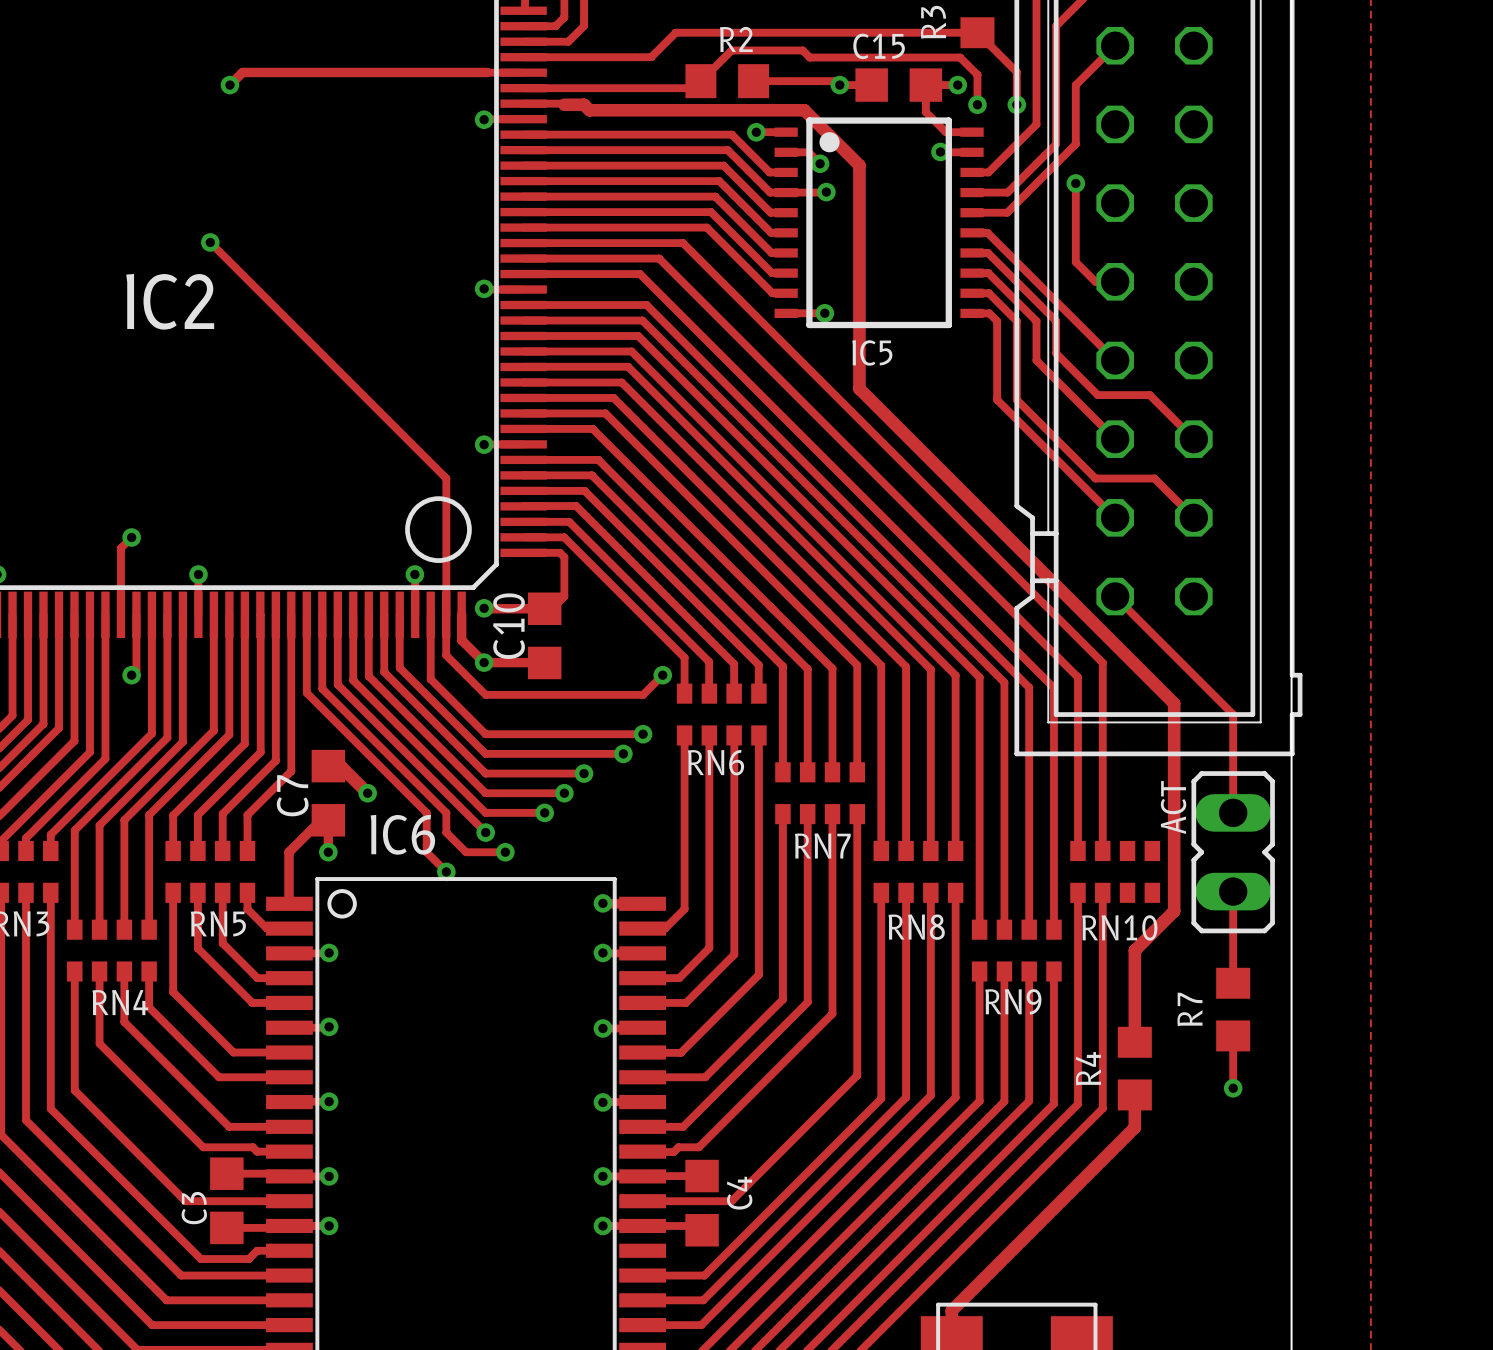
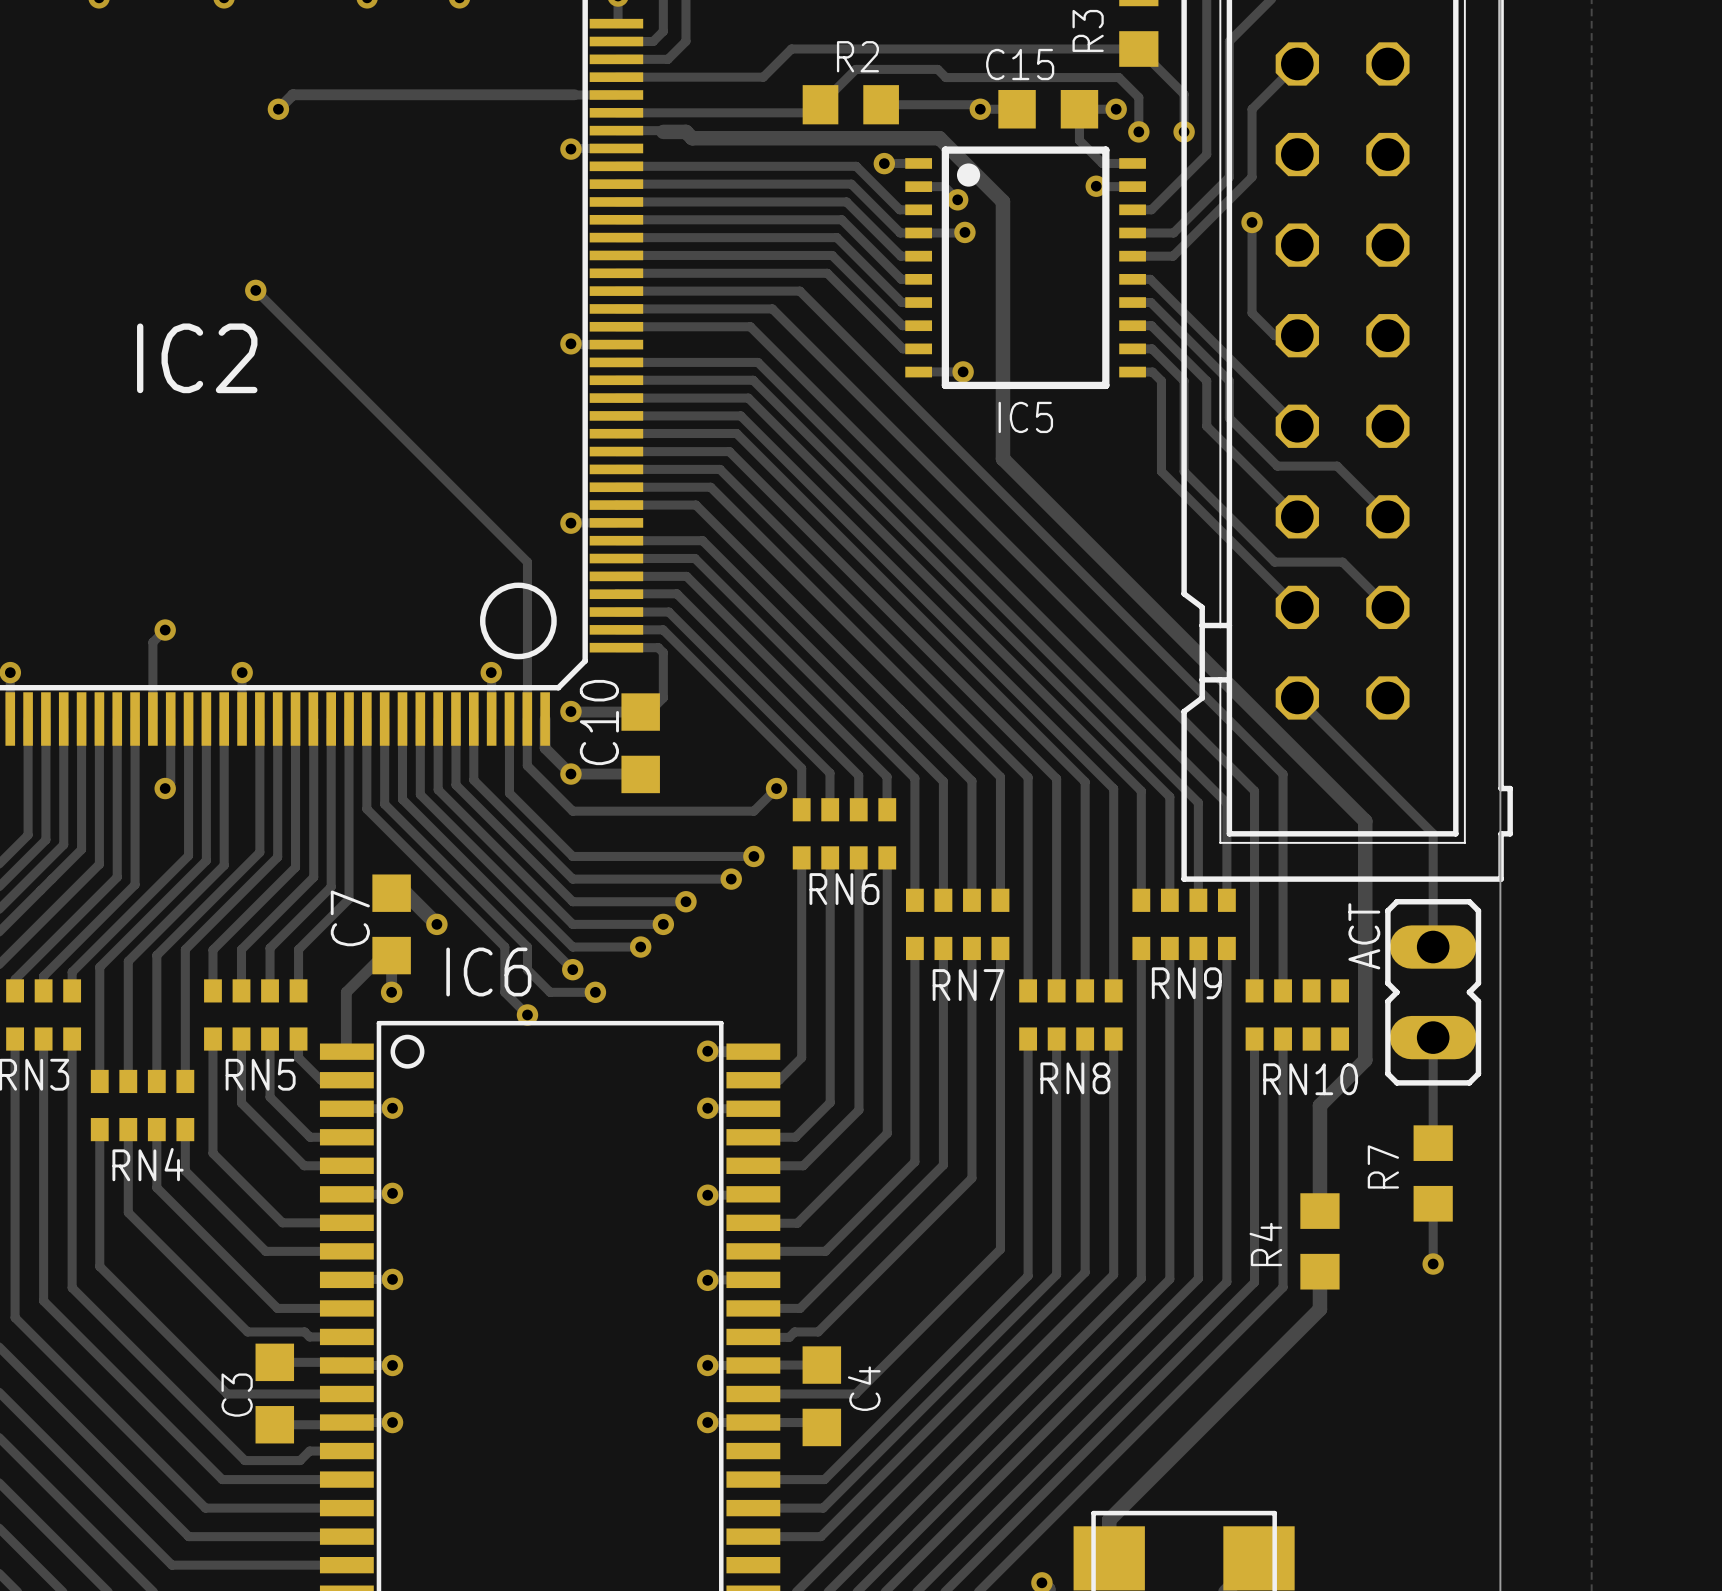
track: (979, 772) (979, 814) -> (1141, 1081) (1141, 1129)
track: (1004, 772) (1004, 814) -> (1169, 1081) (1169, 1129)
track: (1029, 772) (1029, 814) -> (1198, 1081) (1198, 1129)
track: (1053, 772) (1053, 814) -> (1226, 1081) (1226, 1129)
RN9 position: (1016, 950) -> (1184, 924)

